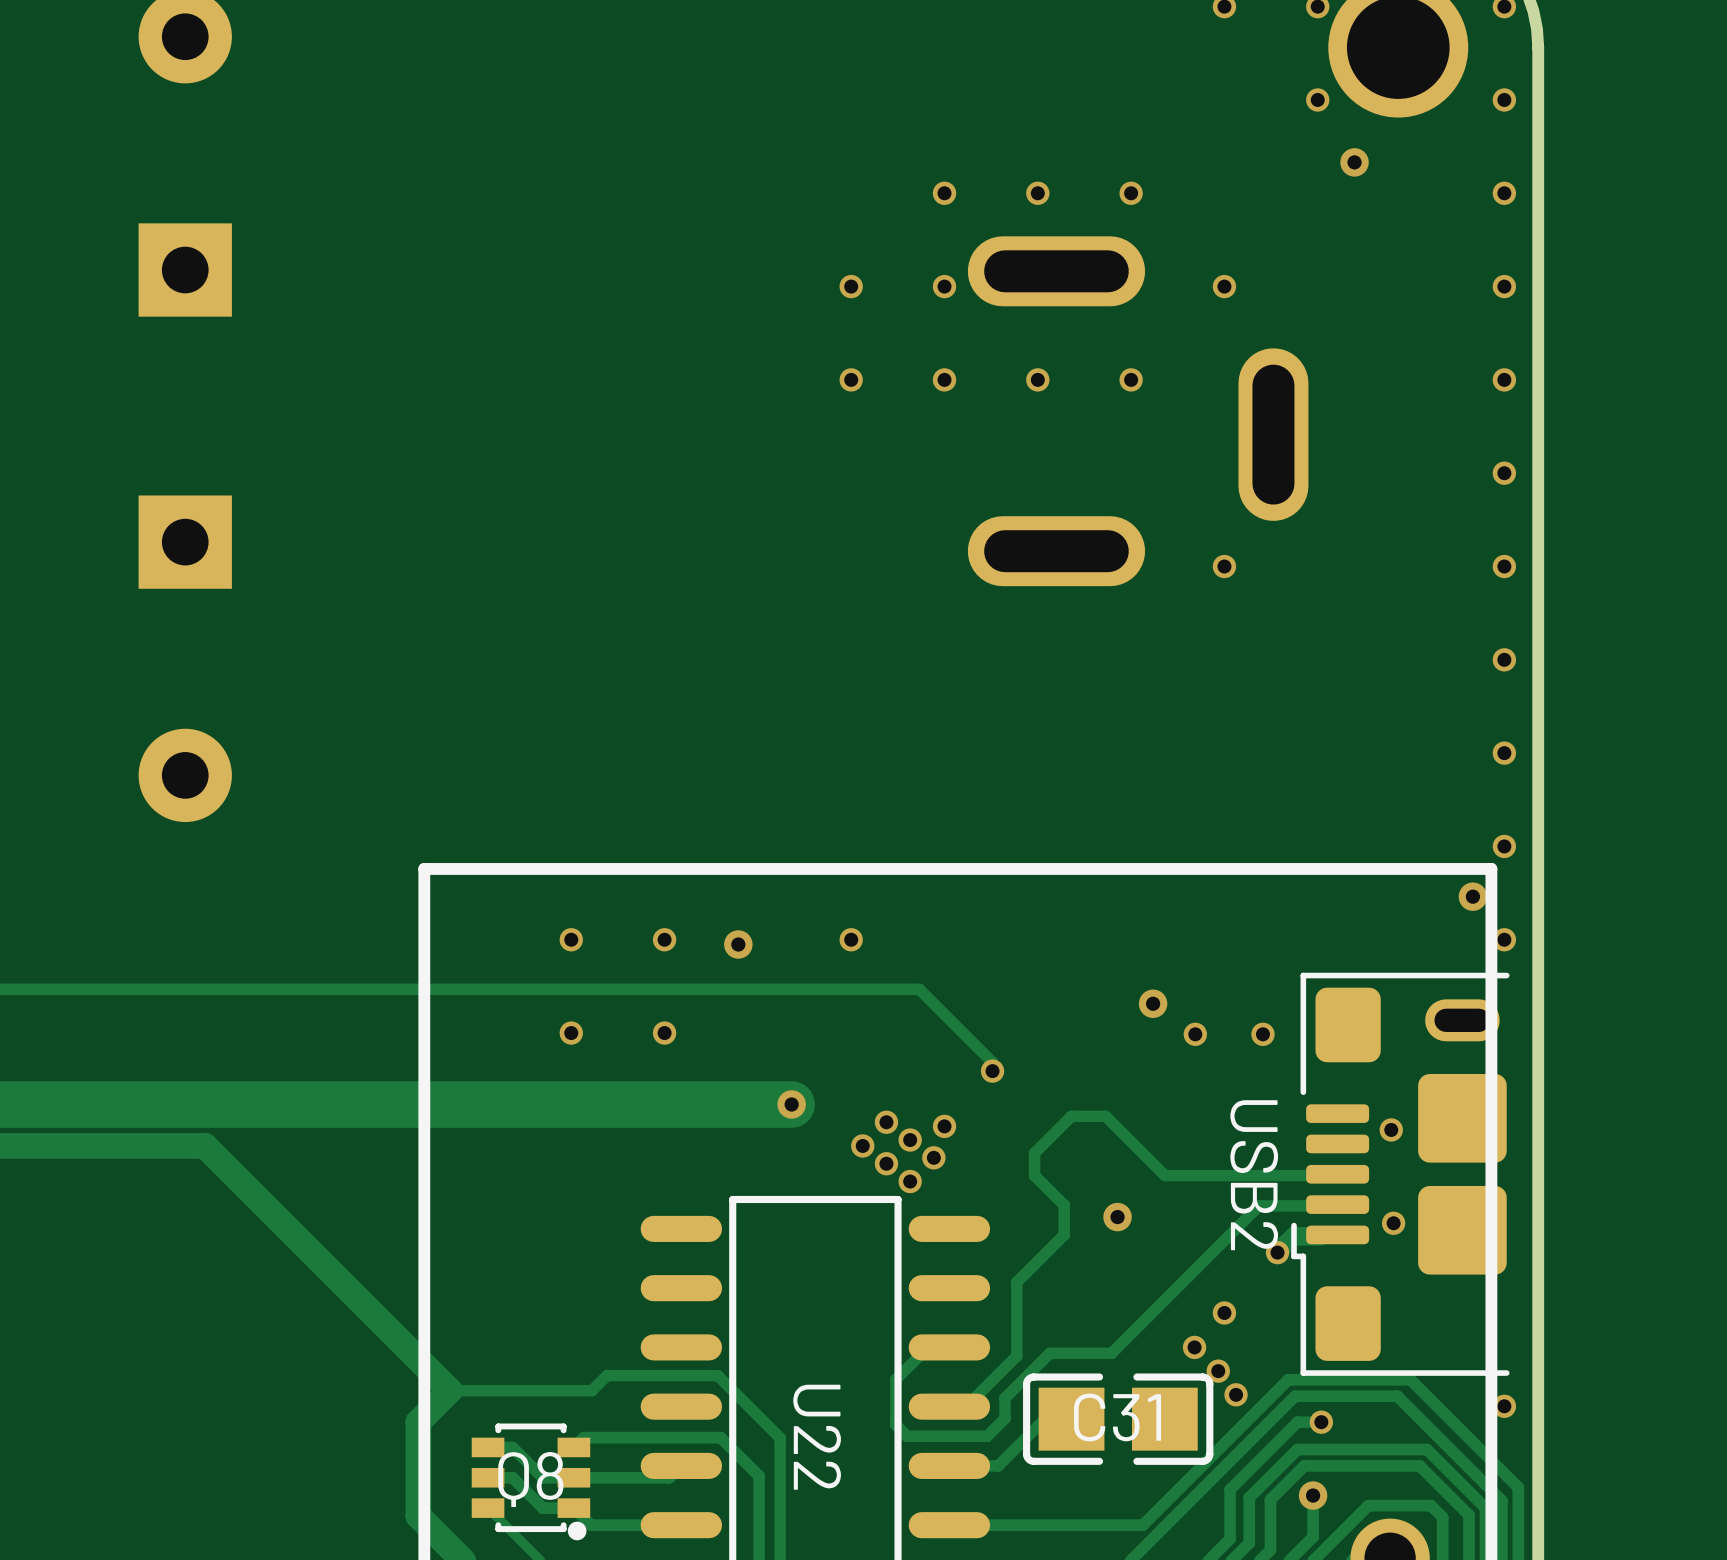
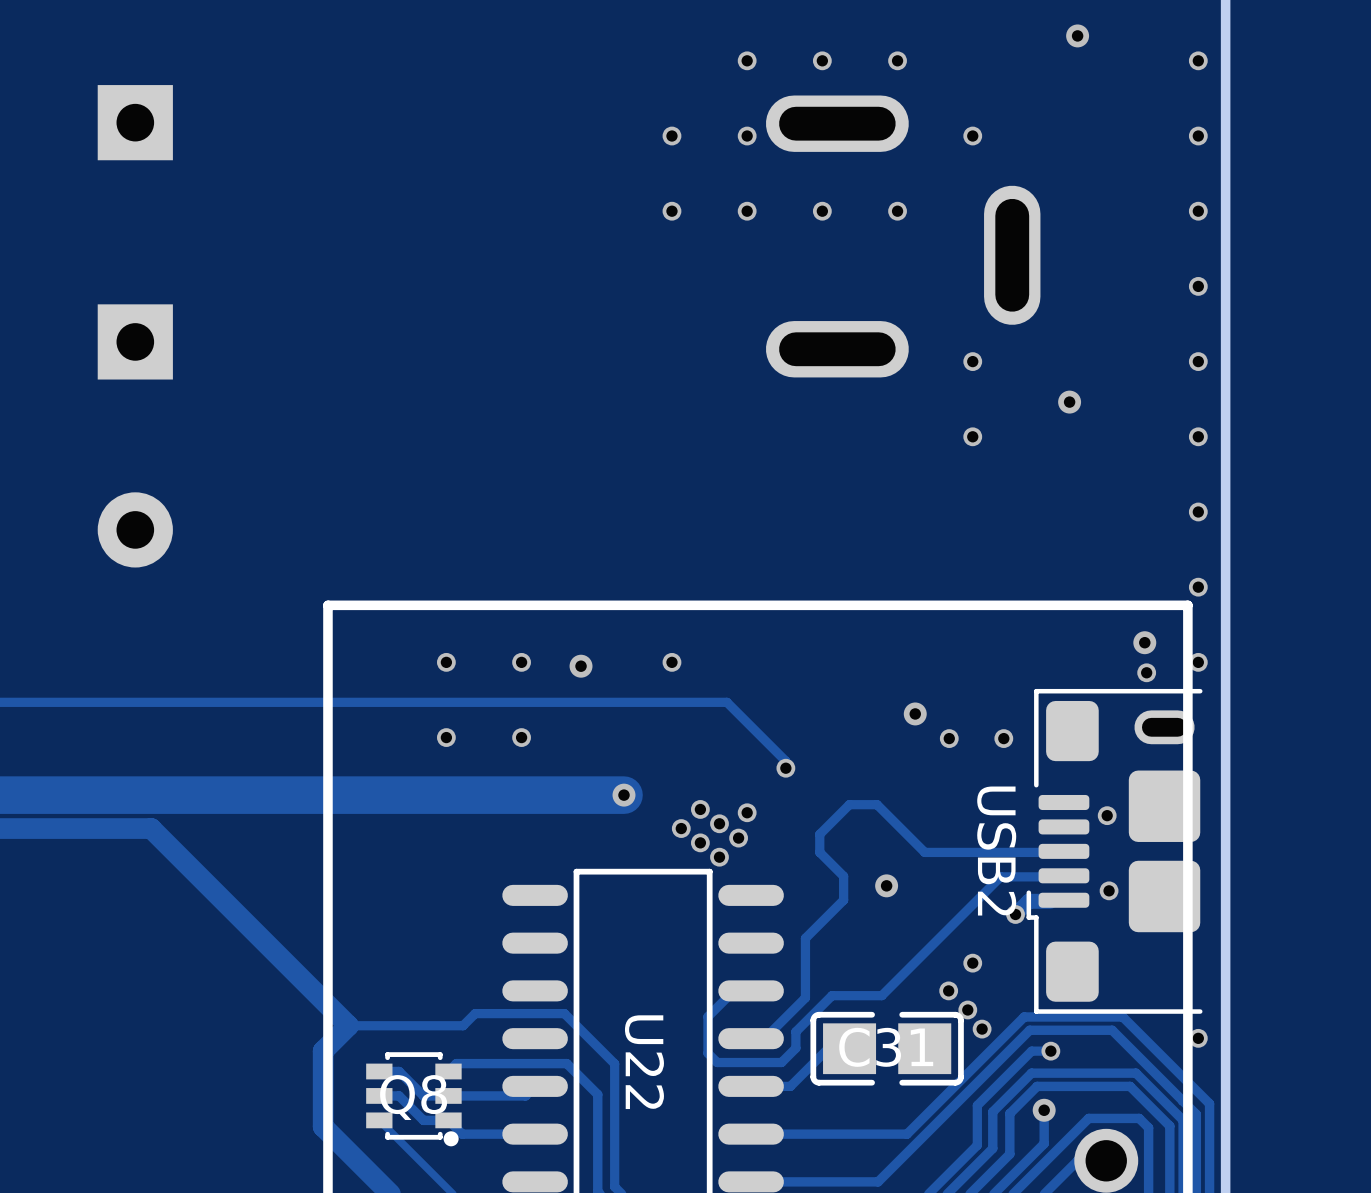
via: none -> (1069, 402)
via: none -> (972, 436)
via position: (1472, 896) -> (1144, 642)
via: none -> (1146, 672)

